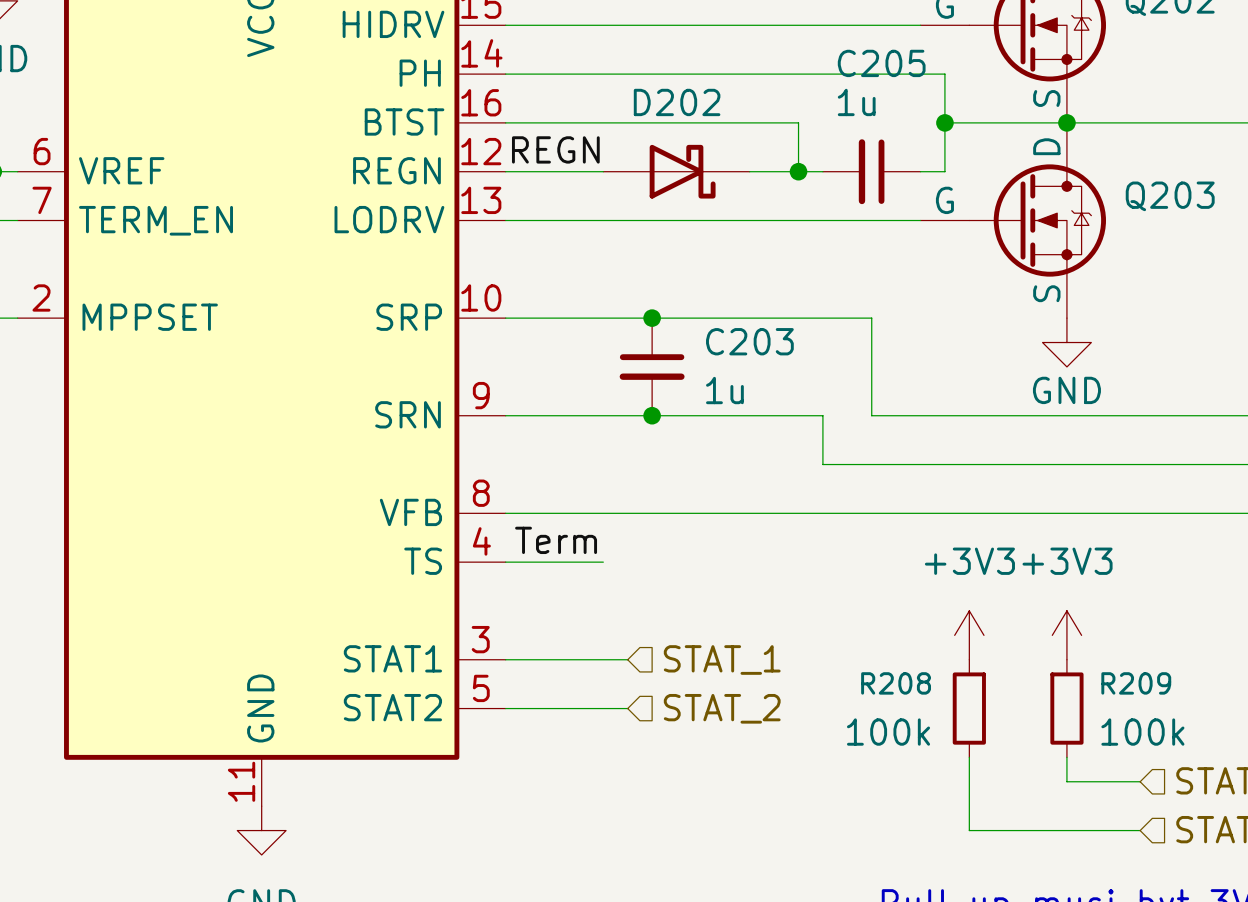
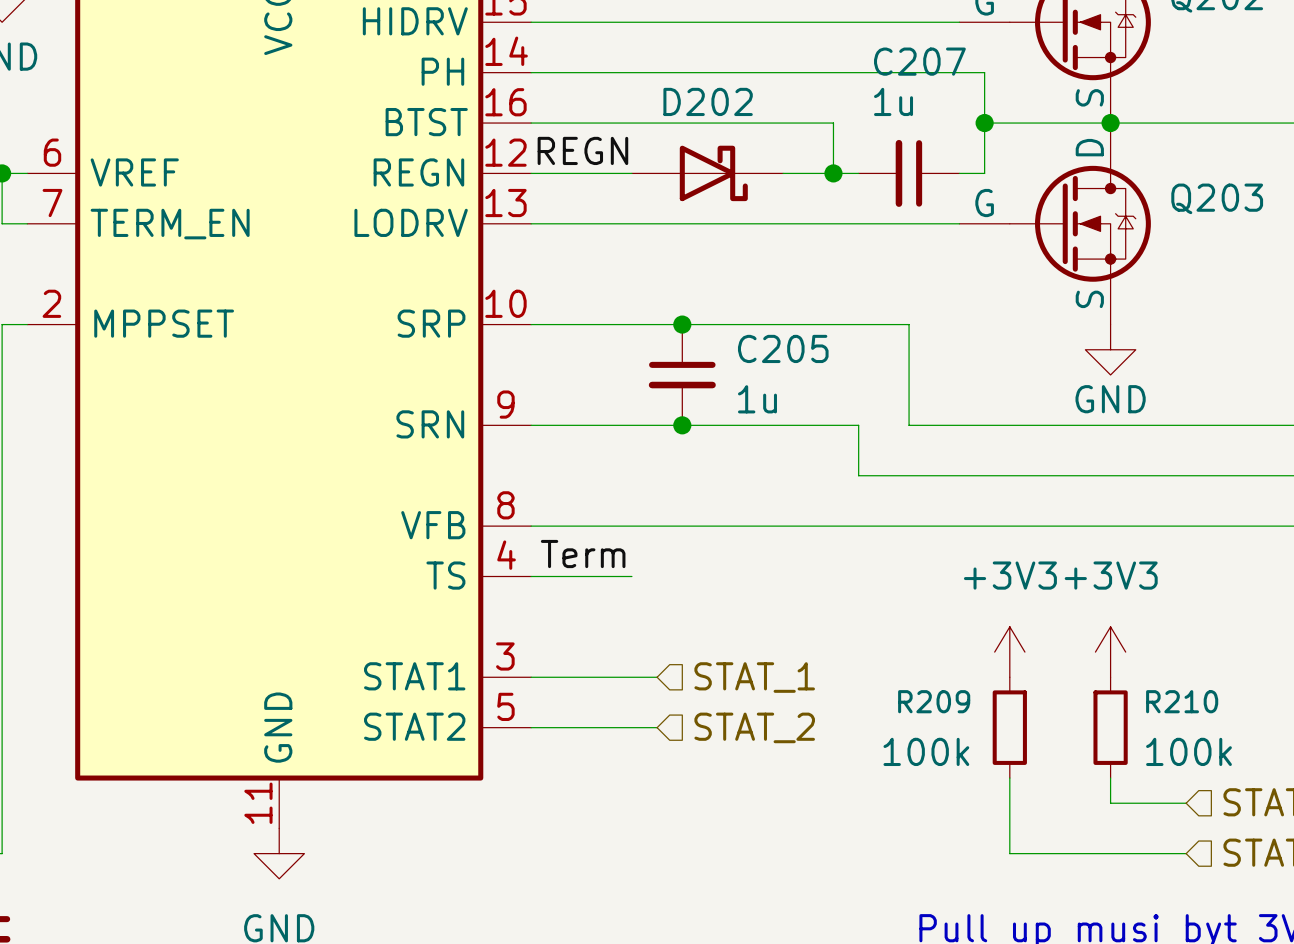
C205 name: C205 (881, 63) -> C207 (919, 61)
C203 name: C203 (749, 341) -> C205 (783, 348)
R208 name: R208 (896, 683) -> R209 (934, 701)
R209 name: R209 (1136, 683) -> R210 (1182, 701)

